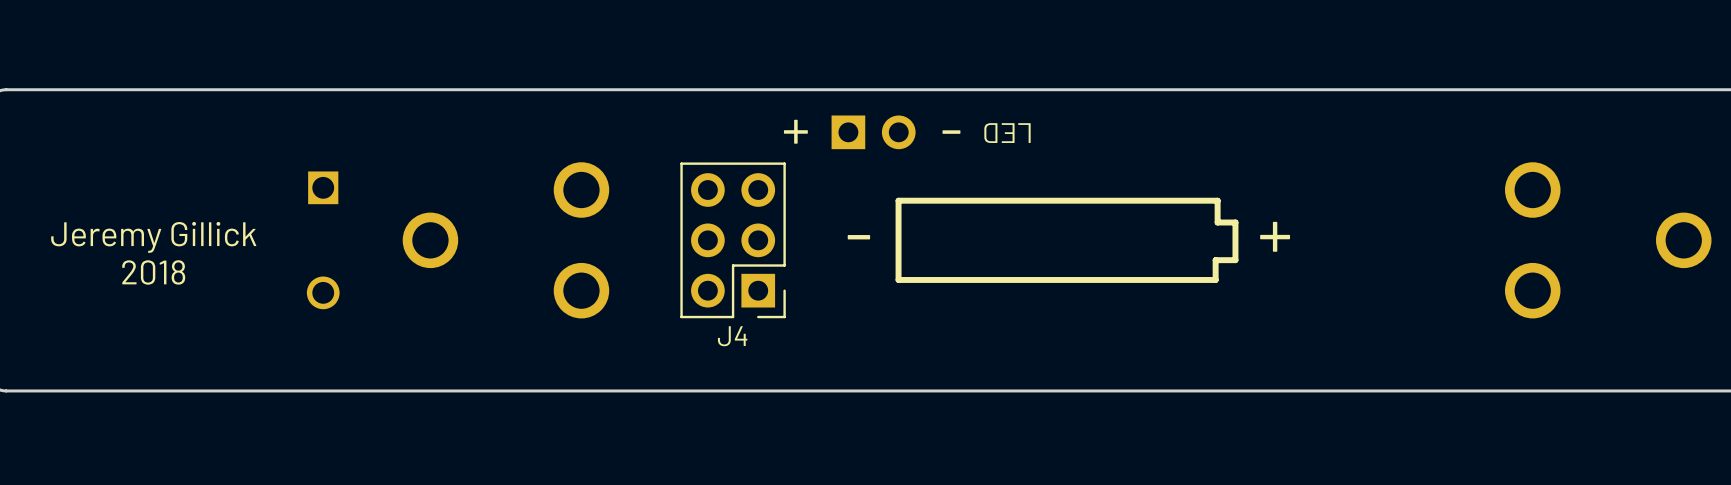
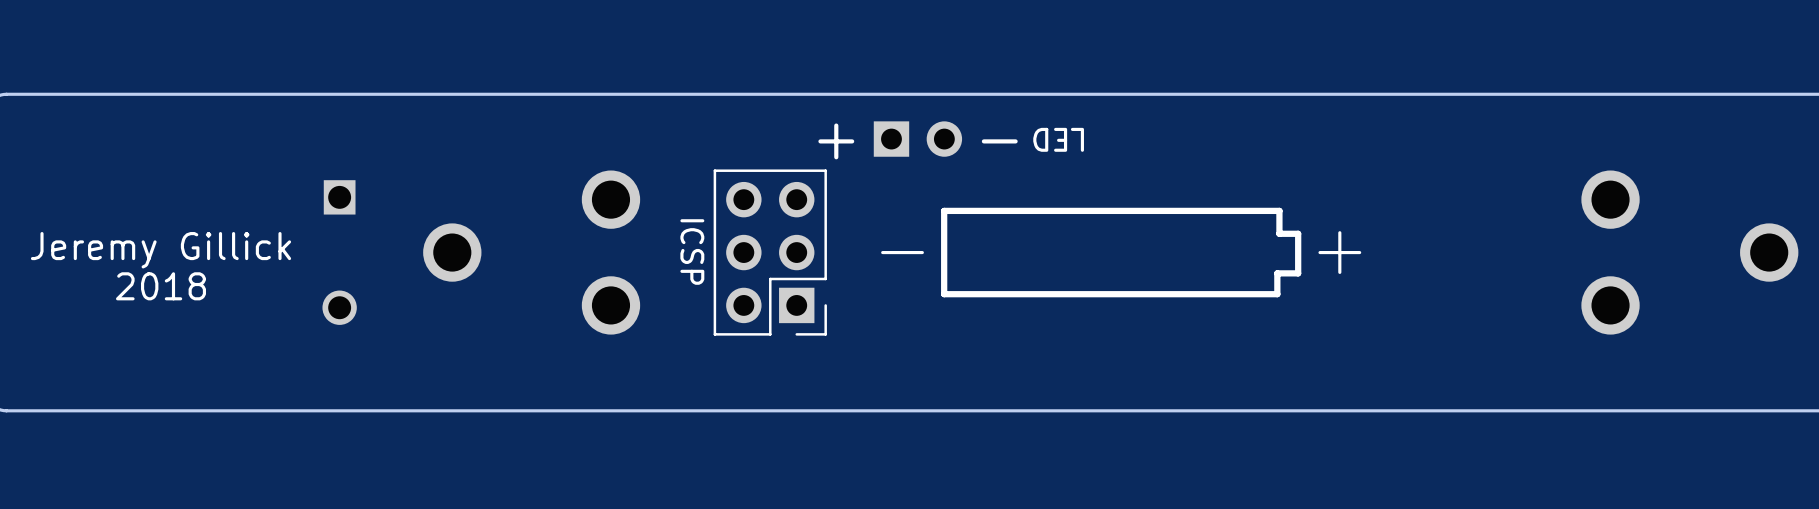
J4: (733, 240) -> none
part: none -> ICSP (770, 252)

